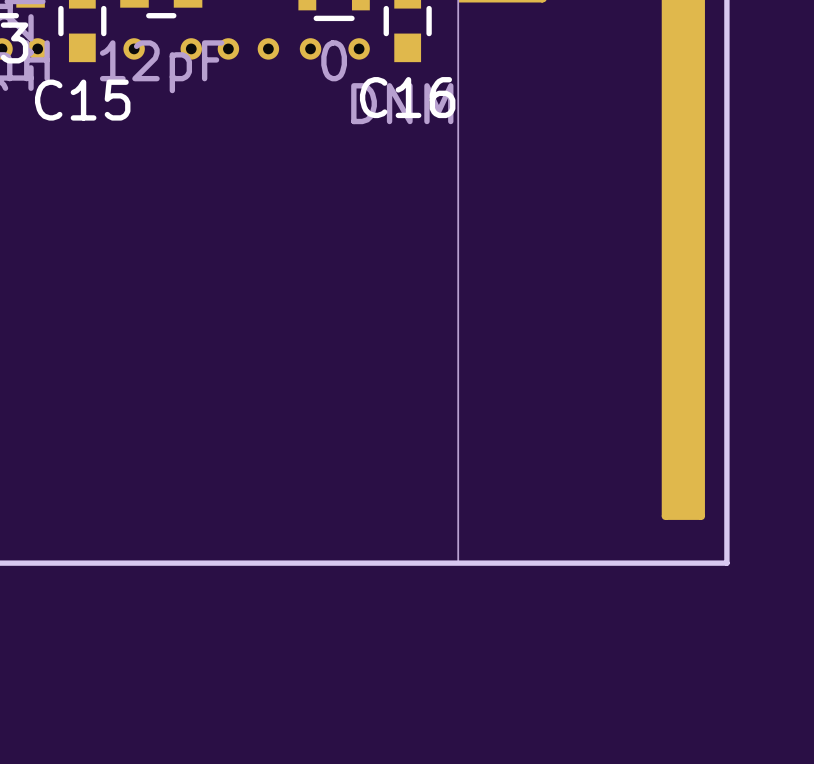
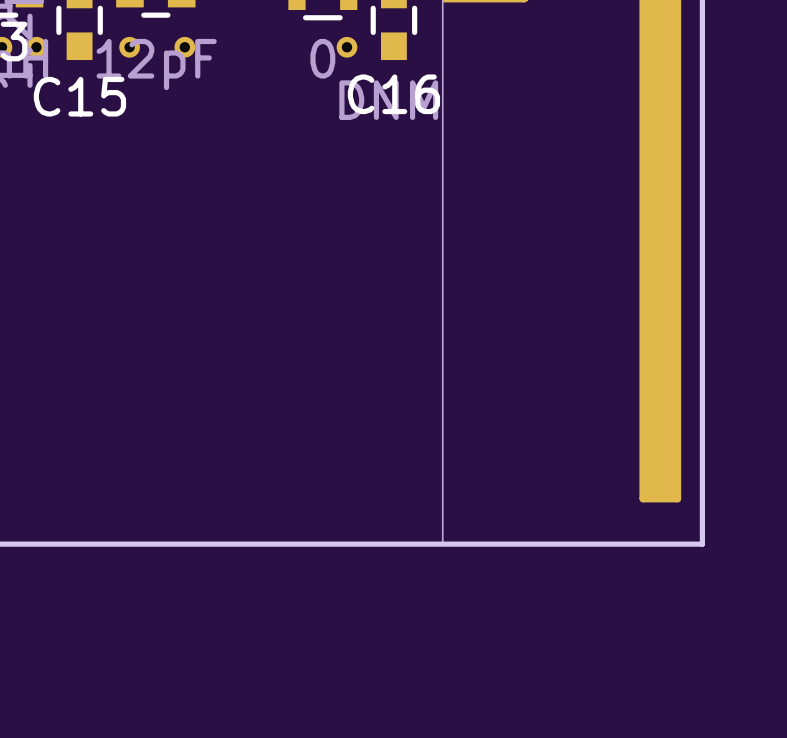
part: (228, 48) -> none
part: (268, 48) -> none
part: (310, 48) -> none

